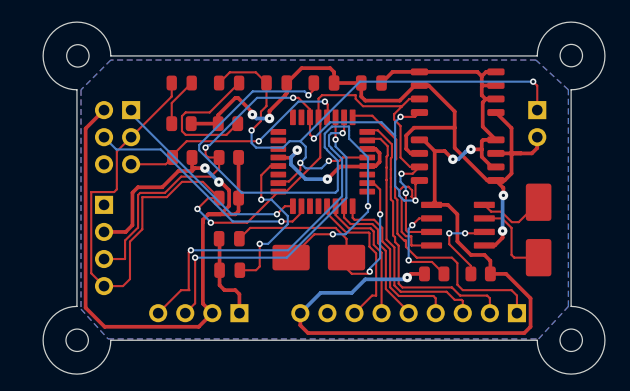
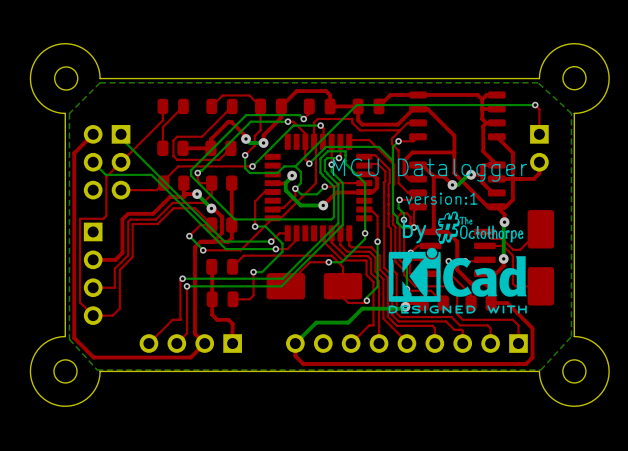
text: none -> MCU Datalogger (429, 170)
text: none -> version:1 (441, 198)
drawing: none -> [388, 211, 527, 314]
text: none -> by (414, 231)

